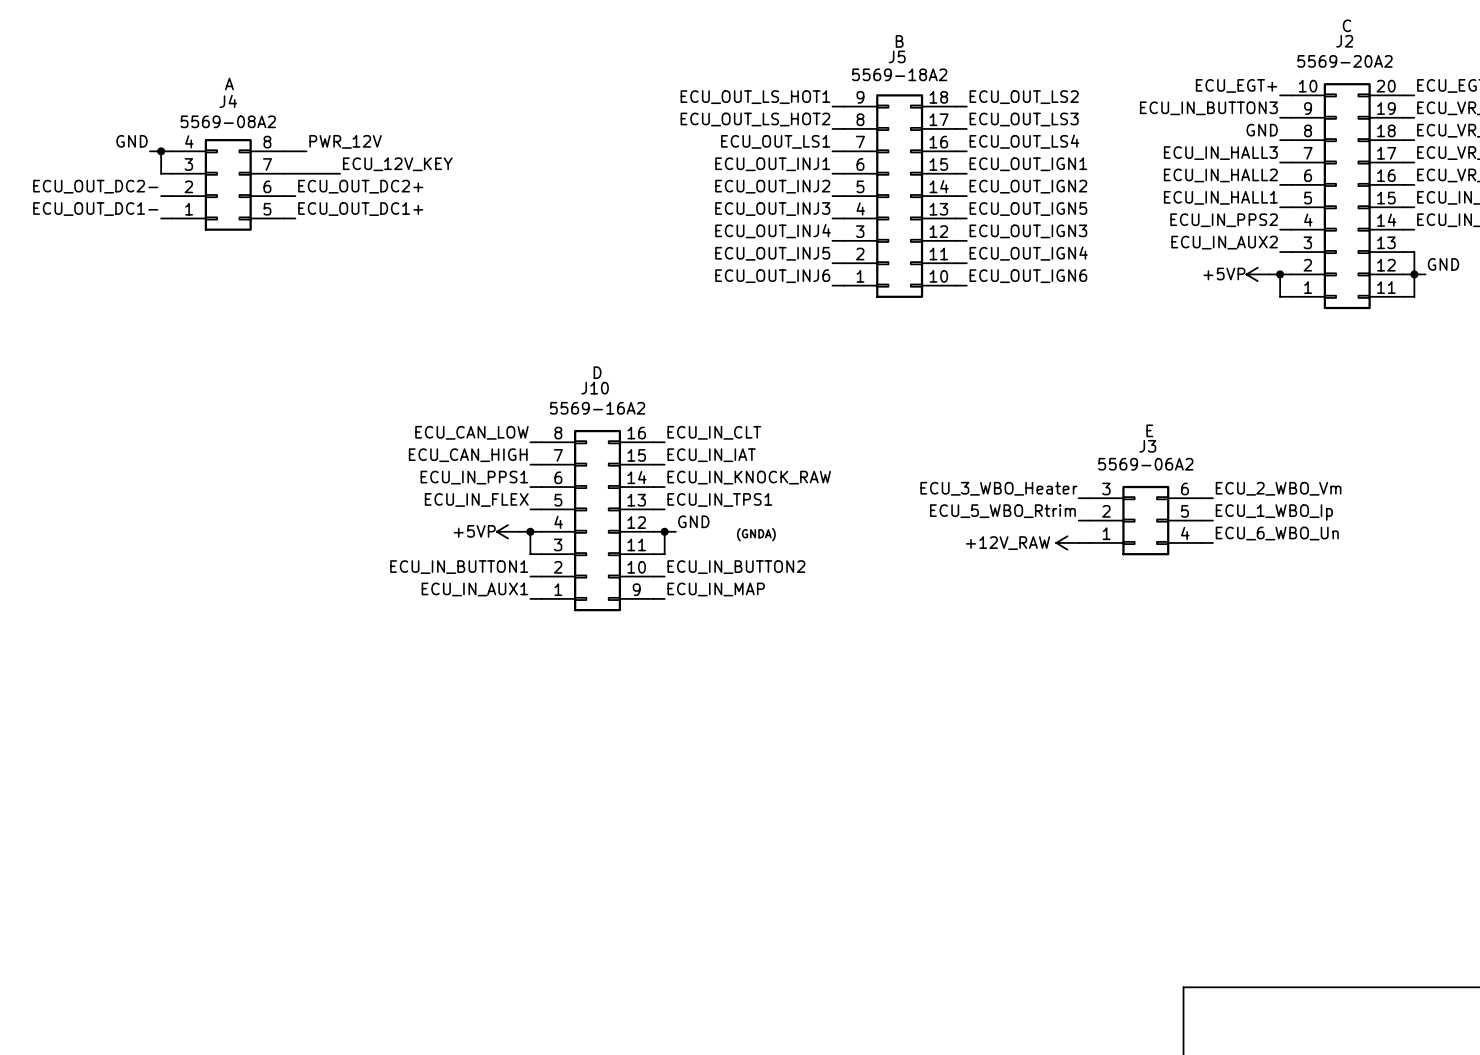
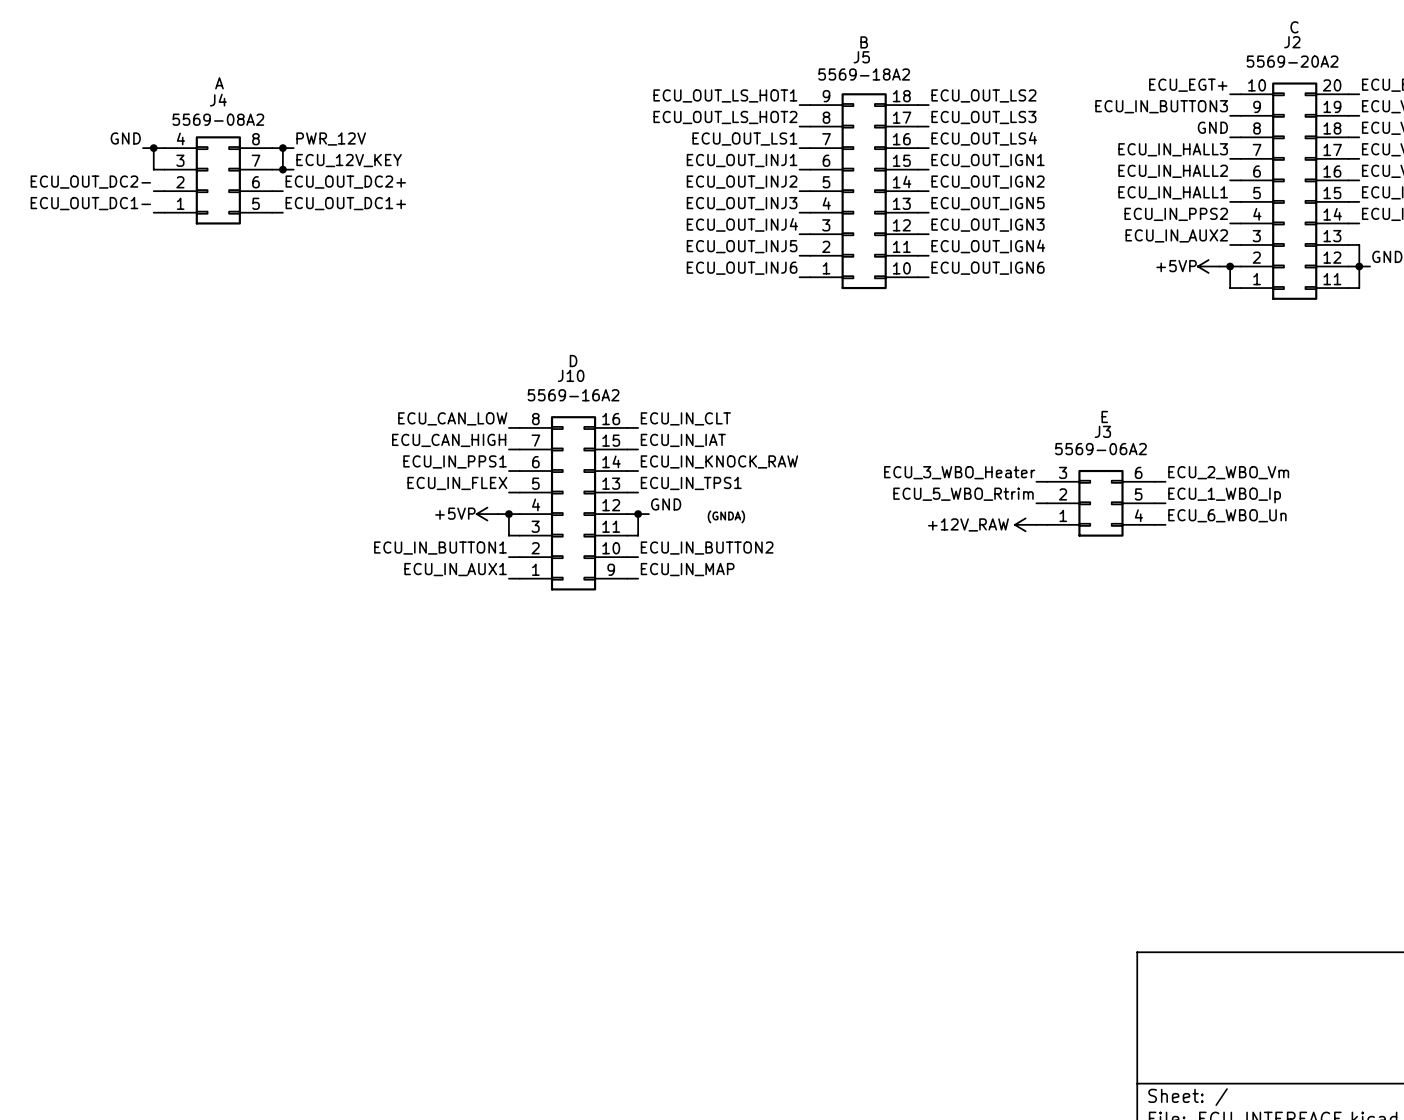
wire: none -> (282, 148) (282, 169)
junction: none -> (282, 148)
label position: ECU_12V_KEY (397, 164) -> ECU_12V_KEY (349, 160)
junction: none -> (282, 169)
wire: (306, 173) (340, 173) -> none

